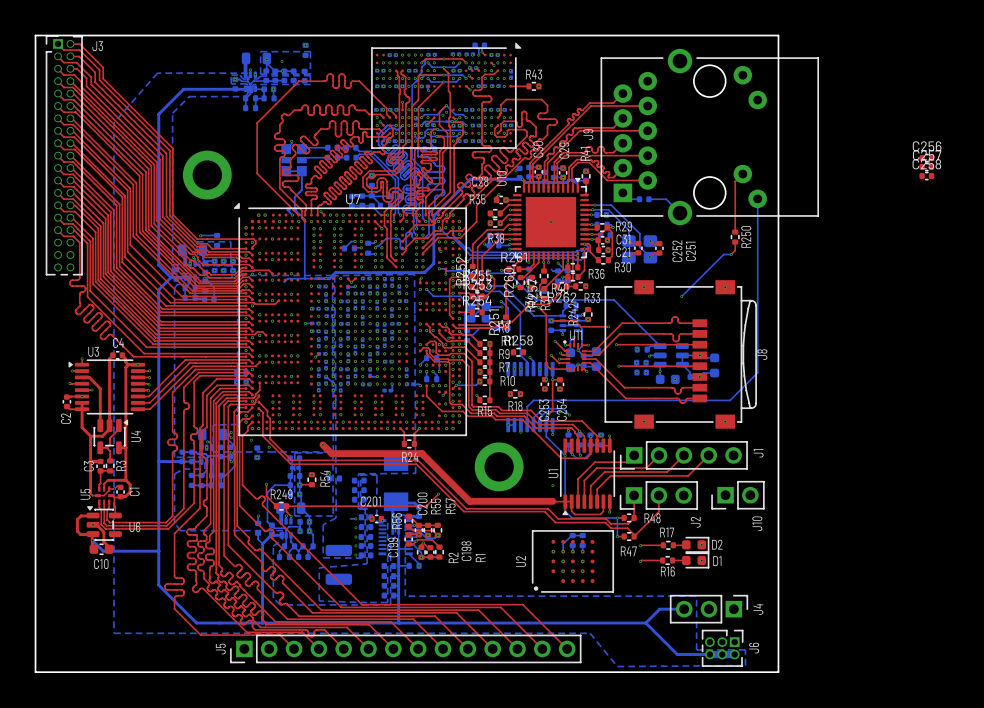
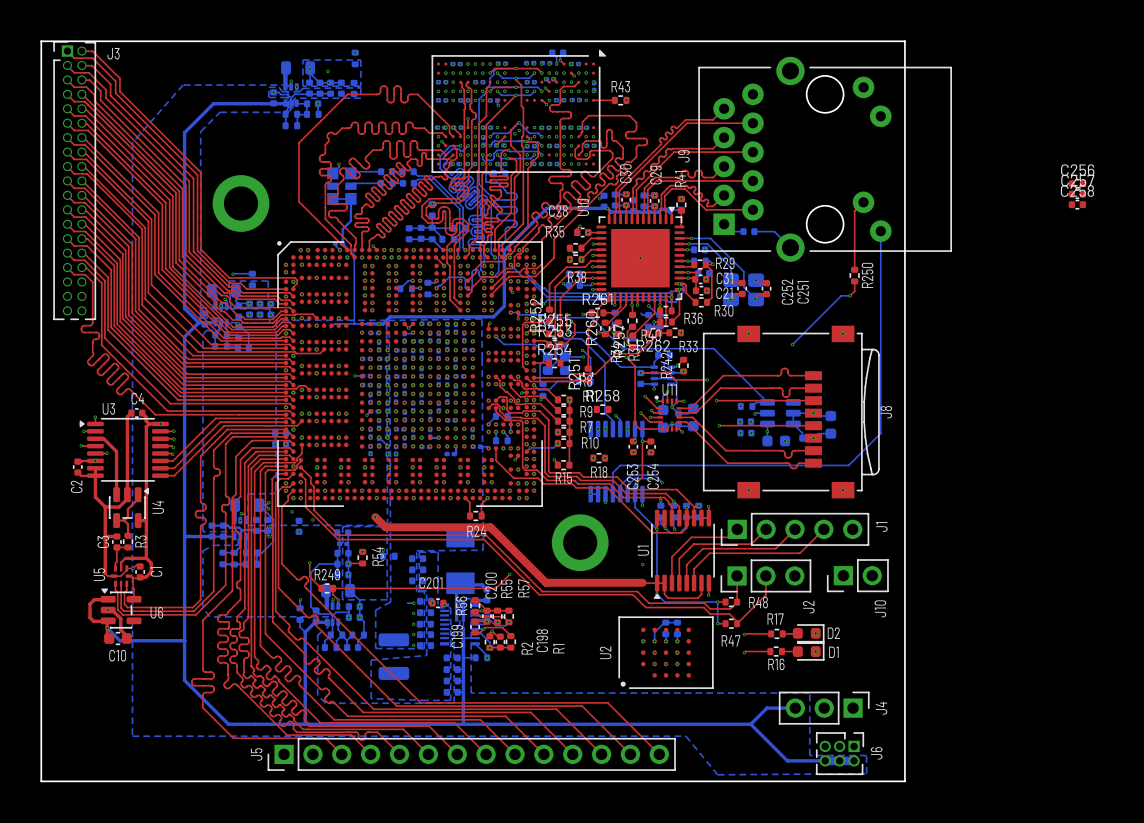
U7: (350, 319) -> none
part: none -> (409, 373)

